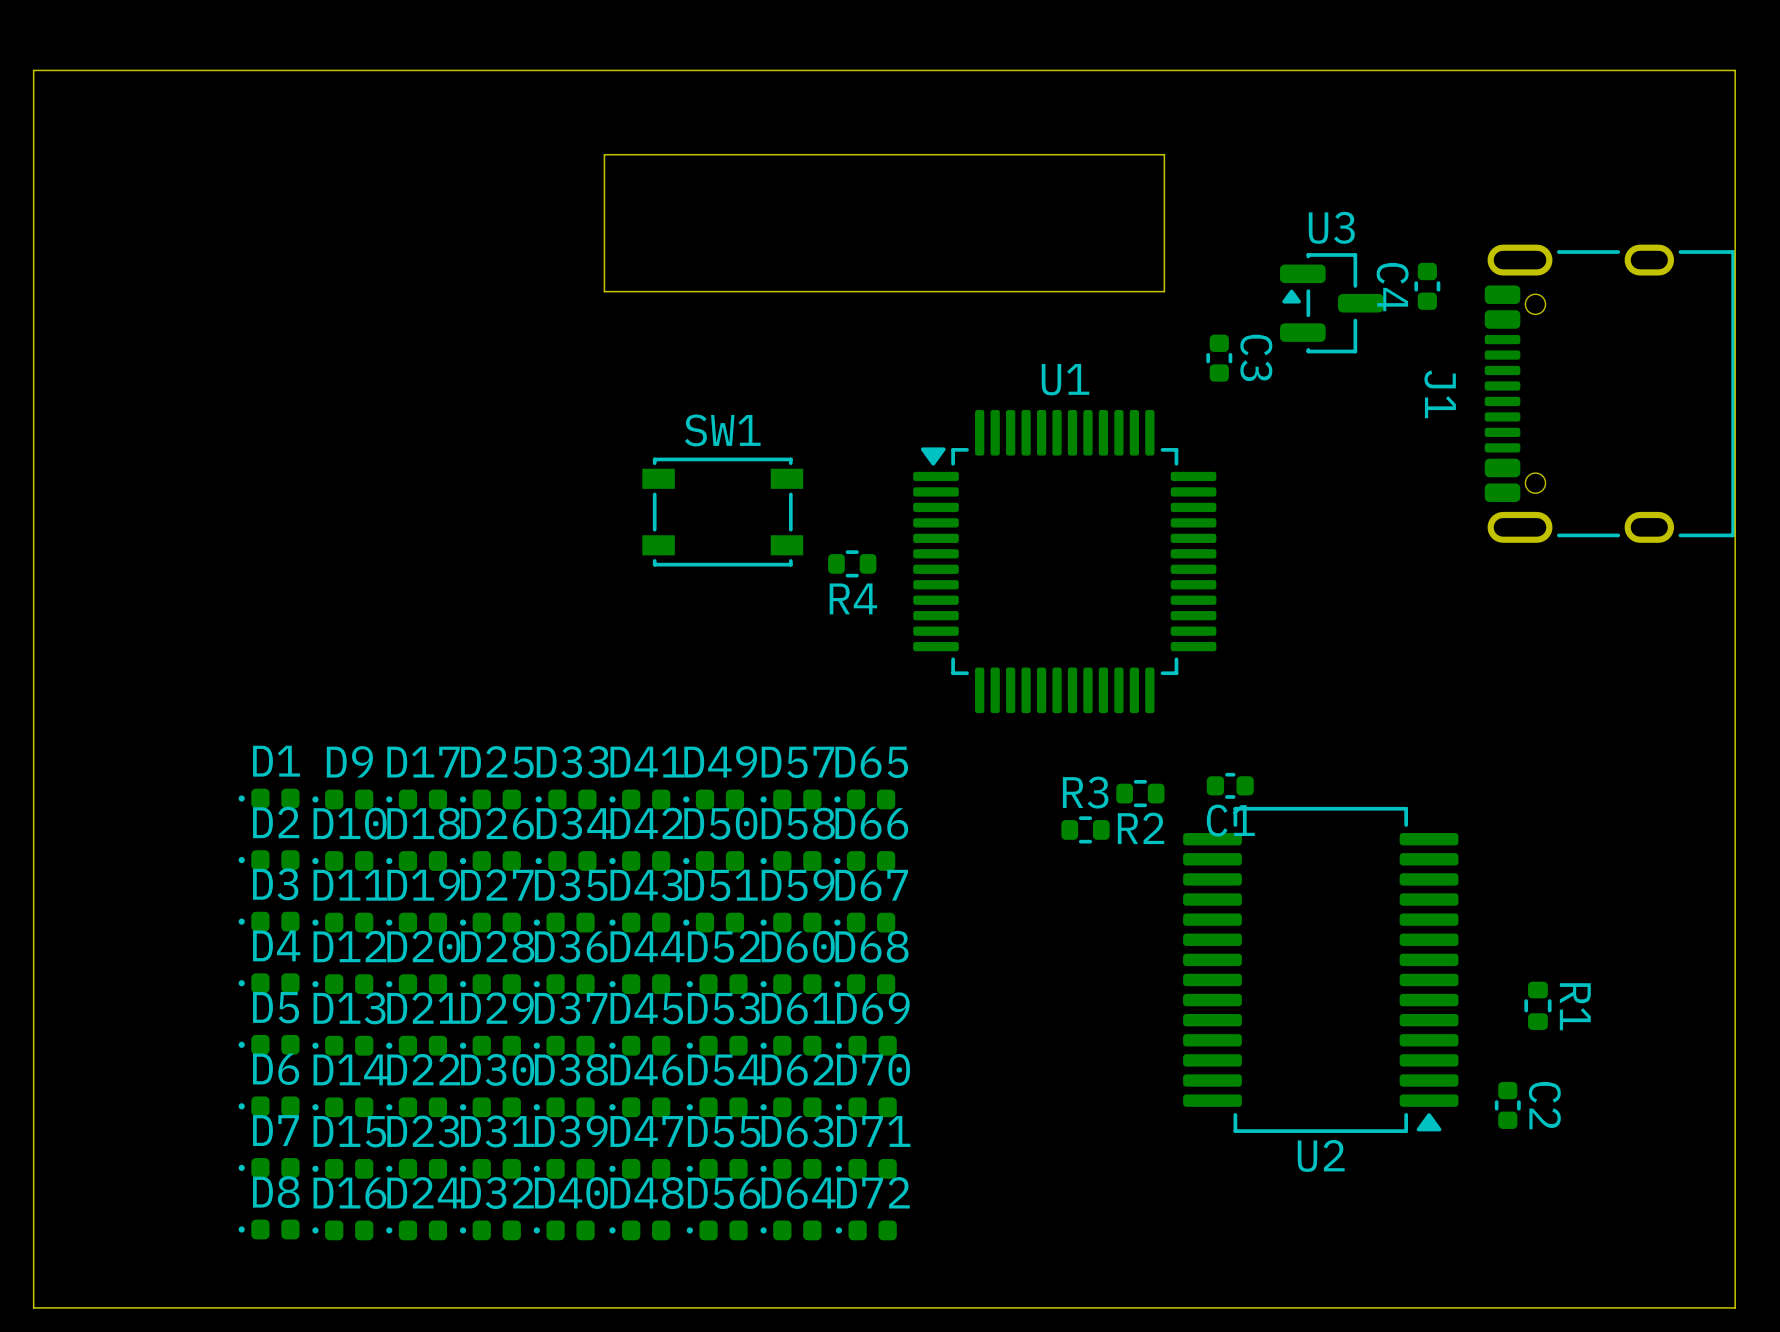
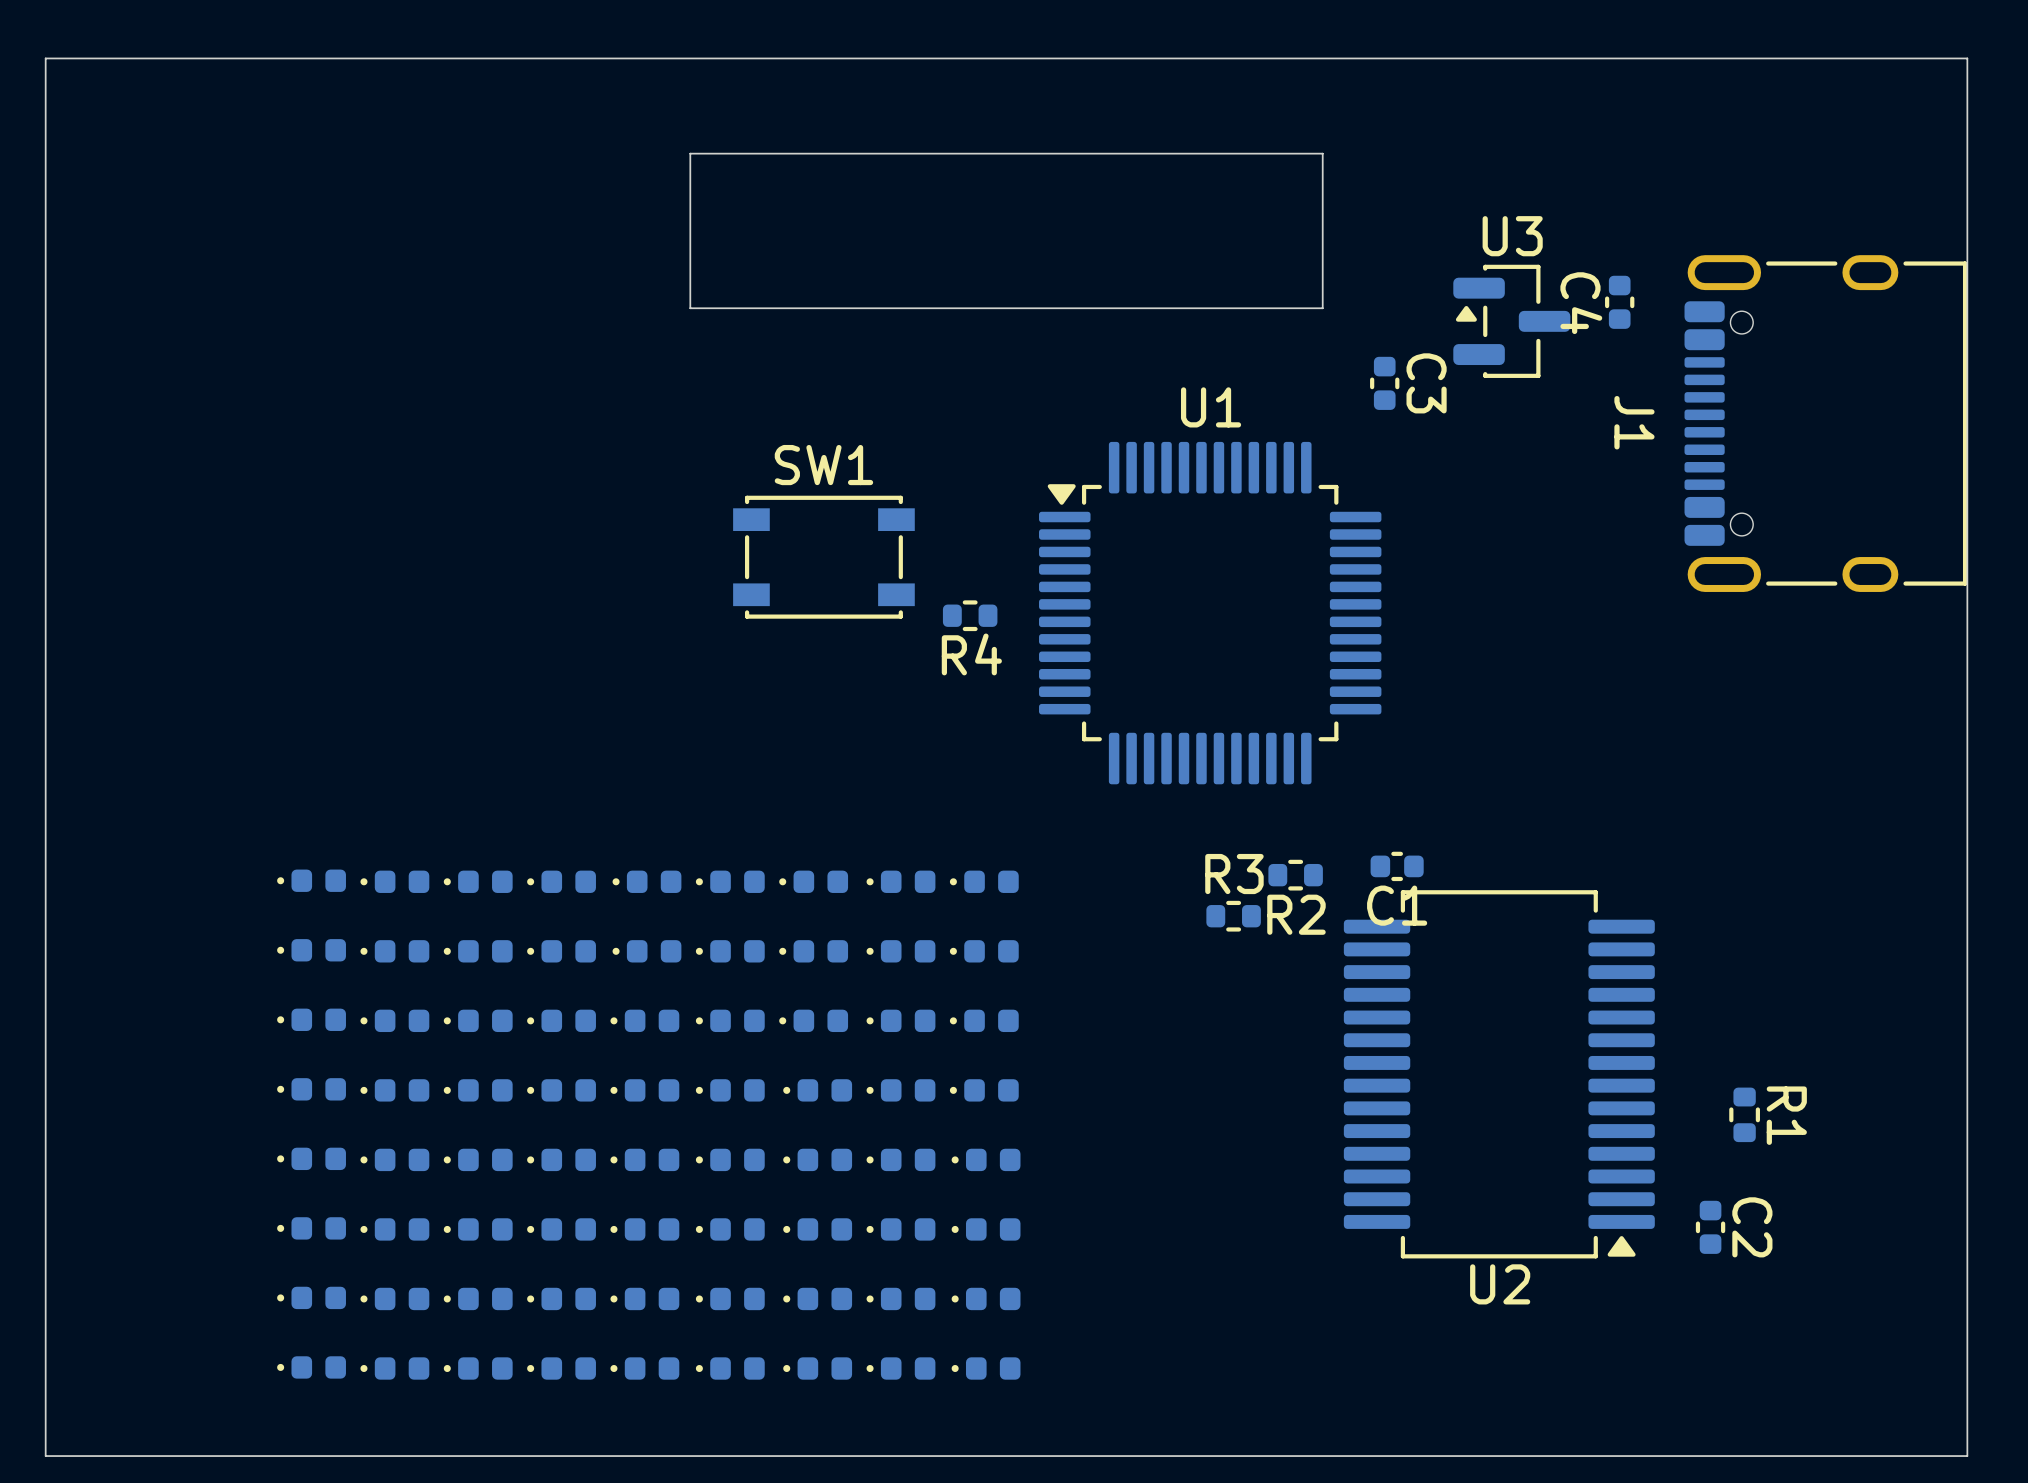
D1 name: D1 (276, 761) -> none
D9 name: D9 (349, 761) -> none
D49 name: D49 (720, 761) -> none
D17 name: D17 (423, 762) -> none
D25 name: D25 (497, 762) -> none
D33 name: D33 (572, 762) -> none
D41 name: D41 (647, 762) -> none
D57 name: D57 (797, 762) -> none
D65 name: D65 (871, 762) -> none
D2 name: D2 (276, 822) -> none
D10 name: D10 (350, 823) -> none
D18 name: D18 (423, 823) -> none
D26 name: D26 (497, 823) -> none
D34 name: D34 (573, 823) -> none
D42 name: D42 (646, 823) -> none
D50 name: D50 (720, 823) -> none
D58 name: D58 (798, 823) -> none
D66 name: D66 (871, 823) -> none
D3 name: D3 (275, 884) -> none
D19 name: D19 (423, 884) -> none
D27 name: D27 (497, 884) -> none
D11 name: D11 (350, 885) -> none
D35 name: D35 (571, 885) -> none
D43 name: D43 (646, 885) -> none
D51 name: D51 (721, 885) -> none
D59 name: D59 (798, 885) -> none
D67 name: D67 (871, 885) -> none
D4 name: D4 (276, 945) -> none
D12 name: D12 (349, 946) -> none
D20 name: D20 (423, 946) -> none
D28 name: D28 (497, 946) -> none
D36 name: D36 (571, 946) -> none
D44 name: D44 (647, 946) -> none
D52 name: D52 (724, 946) -> none
D60 name: D60 (798, 946) -> none
D68 name: D68 (871, 946) -> none
D5 name: D5 (276, 1007) -> none
D13 name: D13 (349, 1008) -> none
D21 name: D21 (424, 1008) -> none
D29 name: D29 (497, 1008) -> none
D37 name: D37 (571, 1008) -> none
D45 name: D45 (646, 1008) -> none
D53 name: D53 (723, 1008) -> none
D61 name: D61 (798, 1008) -> none
D69 name: D69 (873, 1008) -> none
D6 name: D6 (276, 1069) -> none
D14 name: D14 (350, 1069) -> none
D22 name: D22 (423, 1069) -> none
D30 name: D30 (497, 1069) -> none
D38 name: D38 (571, 1069) -> none
D62 name: D62 (798, 1069) -> none
D70 name: D70 (873, 1069) -> none
D46 name: D46 (646, 1070) -> none
D54 name: D54 (724, 1070) -> none
D7 name: D7 (276, 1130) -> none
D15 name: D15 (349, 1131) -> none
D23 name: D23 (423, 1131) -> none
D31 name: D31 (497, 1131) -> none
D39 name: D39 (571, 1131) -> none
D47 name: D47 (646, 1131) -> none
D55 name: D55 (724, 1131) -> none
D63 name: D63 (797, 1131) -> none
D71 name: D71 (873, 1131) -> none
D8 name: D8 (276, 1192) -> none
D24 name: D24 (424, 1192) -> none
D72 name: D72 (873, 1192) -> none
D16 name: D16 (349, 1193) -> none
D32 name: D32 (497, 1193) -> none
D40 name: D40 (571, 1193) -> none
D48 name: D48 (647, 1193) -> none
D56 name: D56 (724, 1193) -> none
D64 name: D64 (798, 1193) -> none

